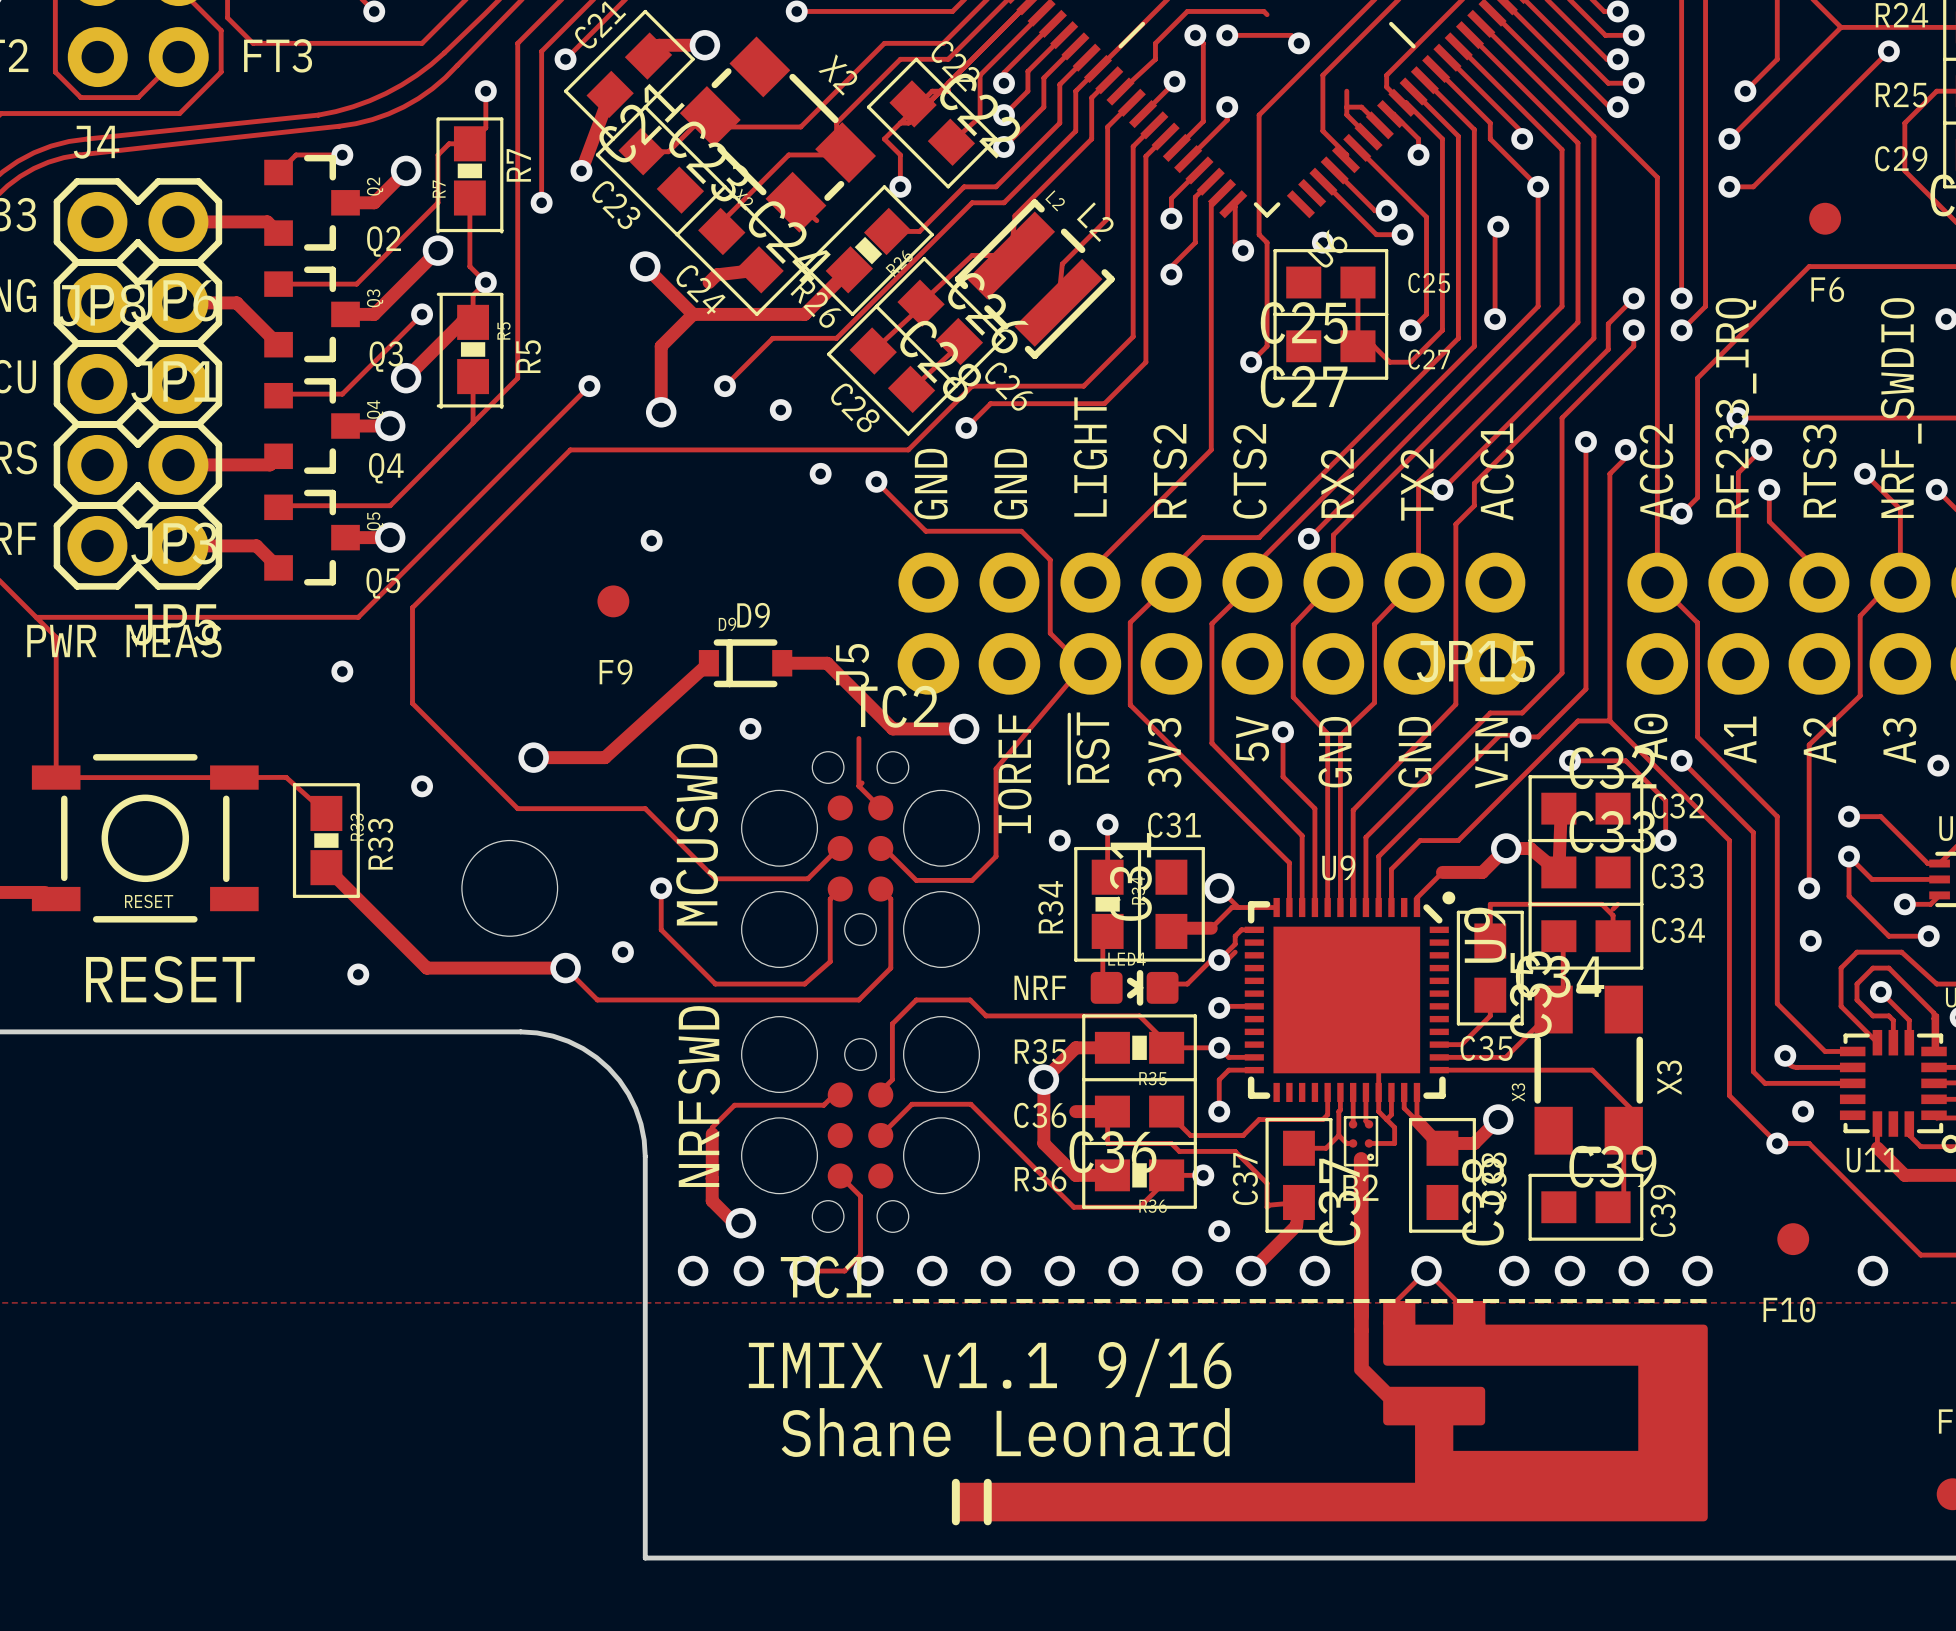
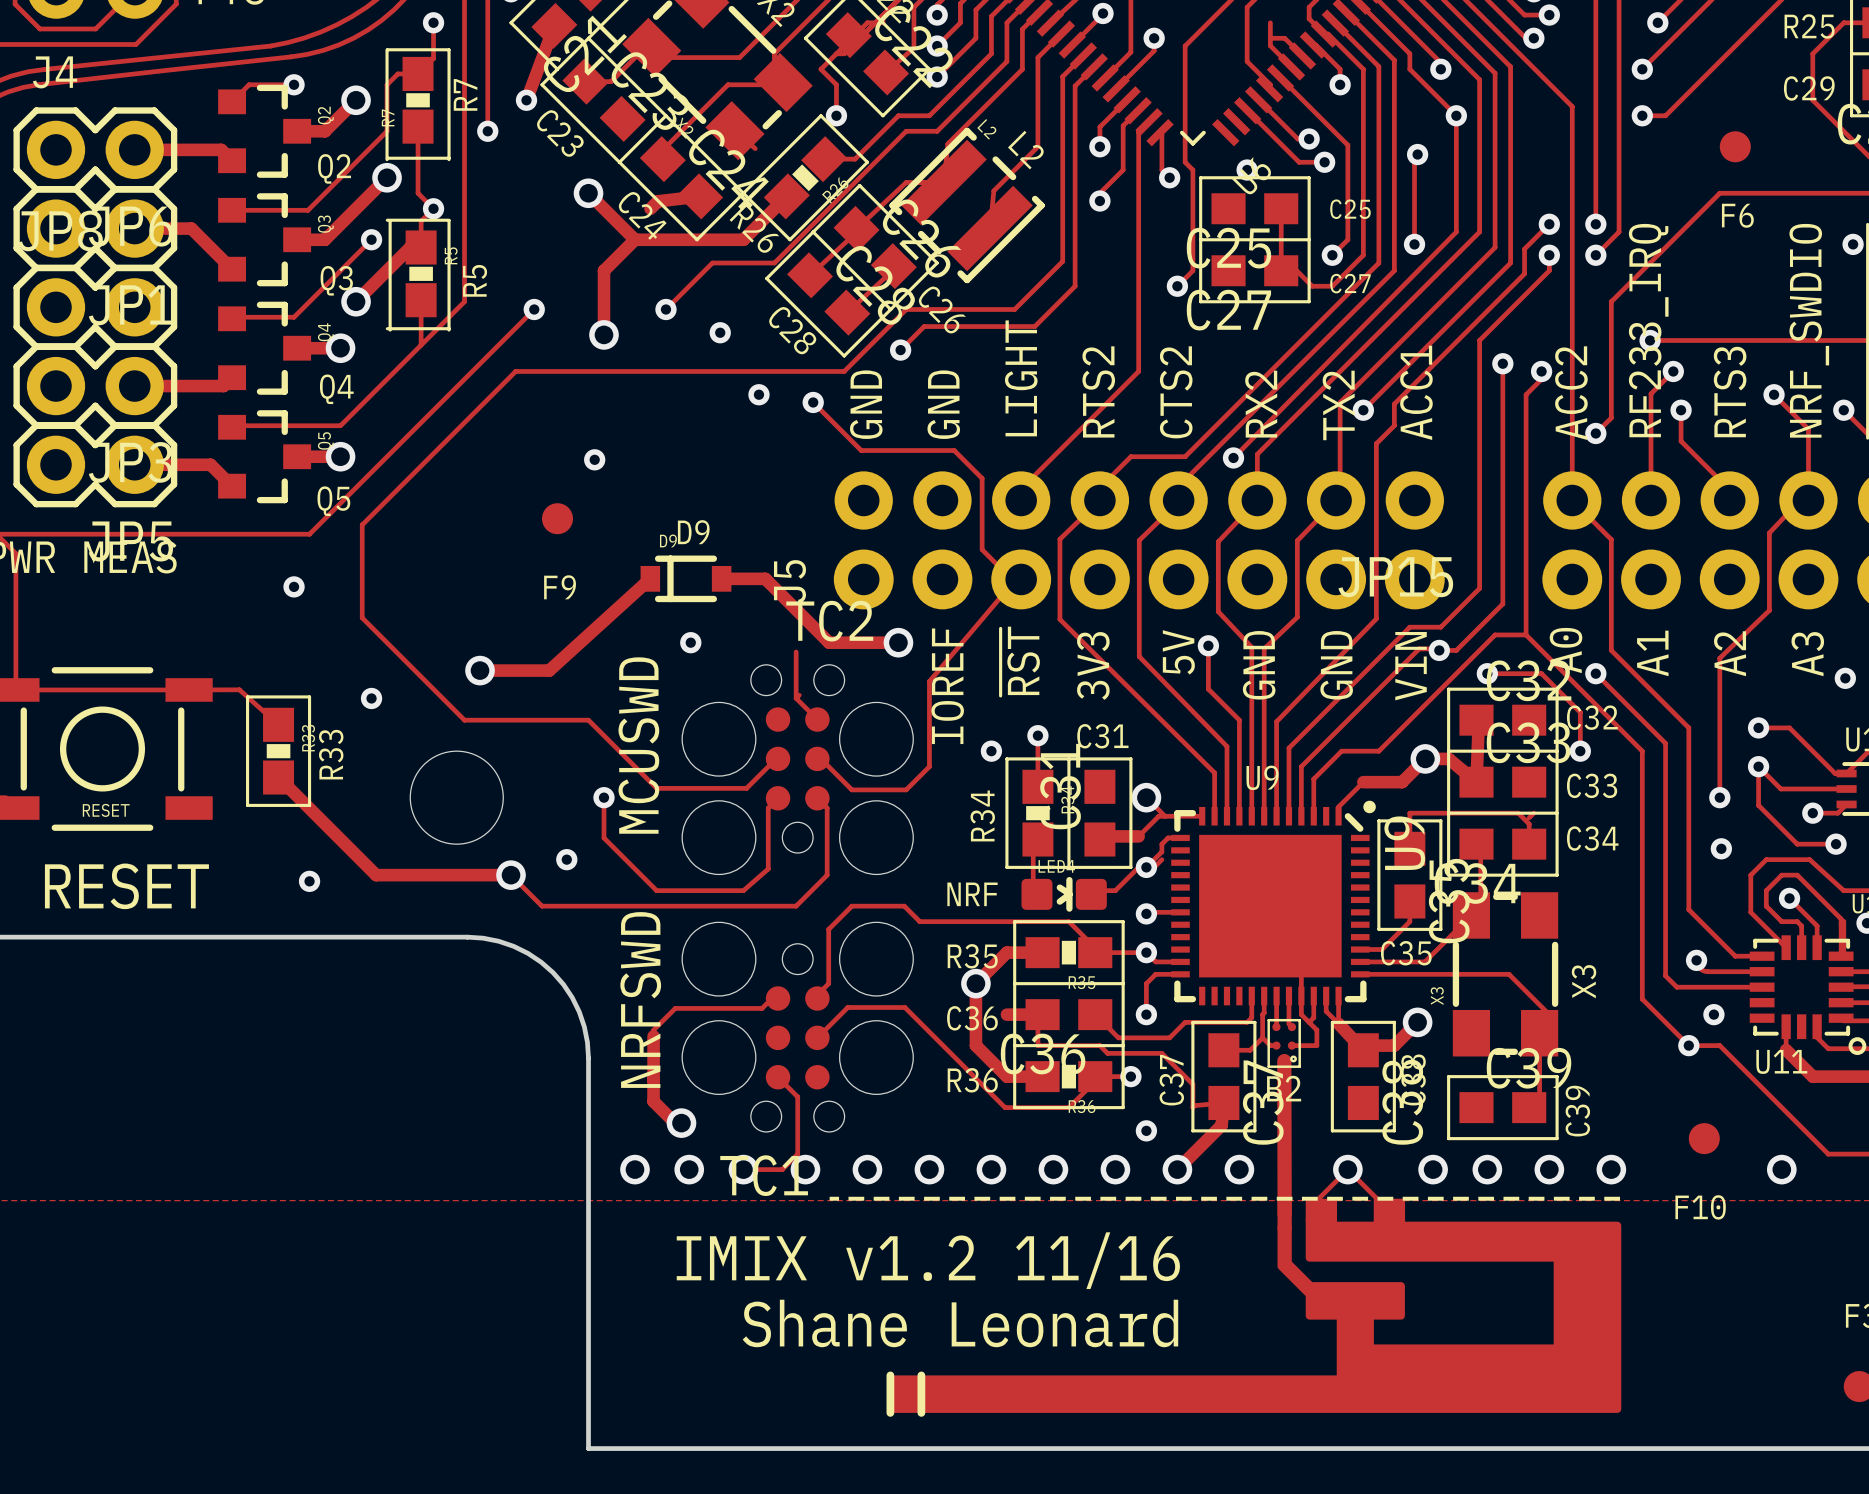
text: IMIX v1.1 9/16 (990, 1367) -> IMIX v1.2 11/16 (928, 1260)
text position: Shane Leonard (1005, 1432) -> Shane Leonard (960, 1323)

